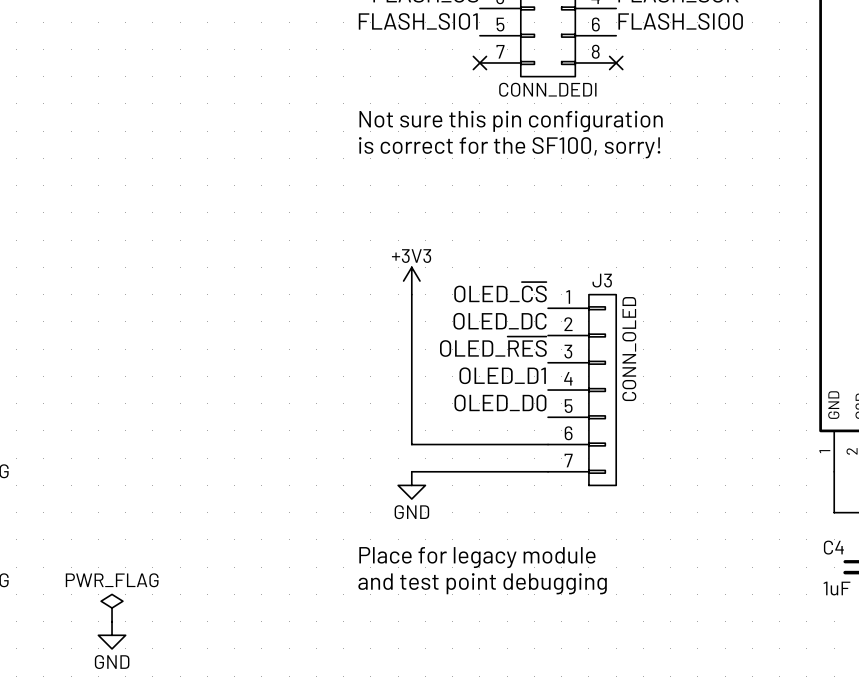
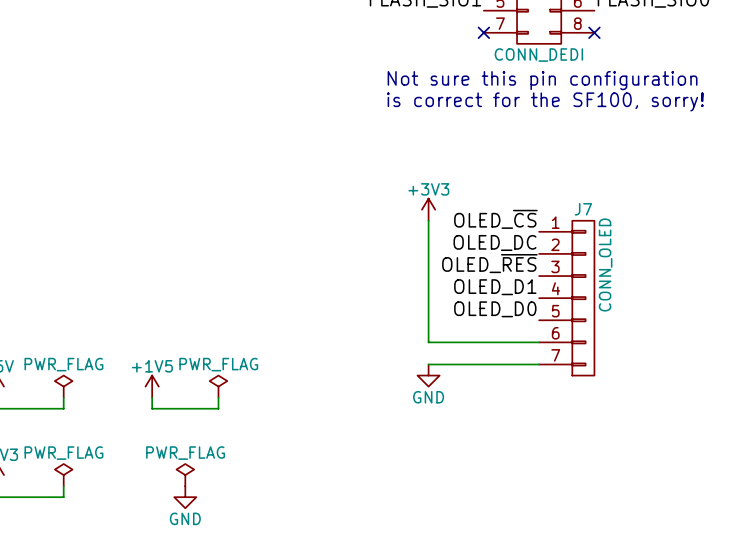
J3 name: J3 (602, 280) -> J7 (583, 209)
power symbol: none -> +1V5 (152, 386)
power symbol: none -> PWR_FLAG (218, 386)
wire: none -> (152, 397) (152, 408) (218, 408) (218, 397)
text: Place for legacy module (477, 557) -> none
text: and test point debugging (482, 583) -> none

